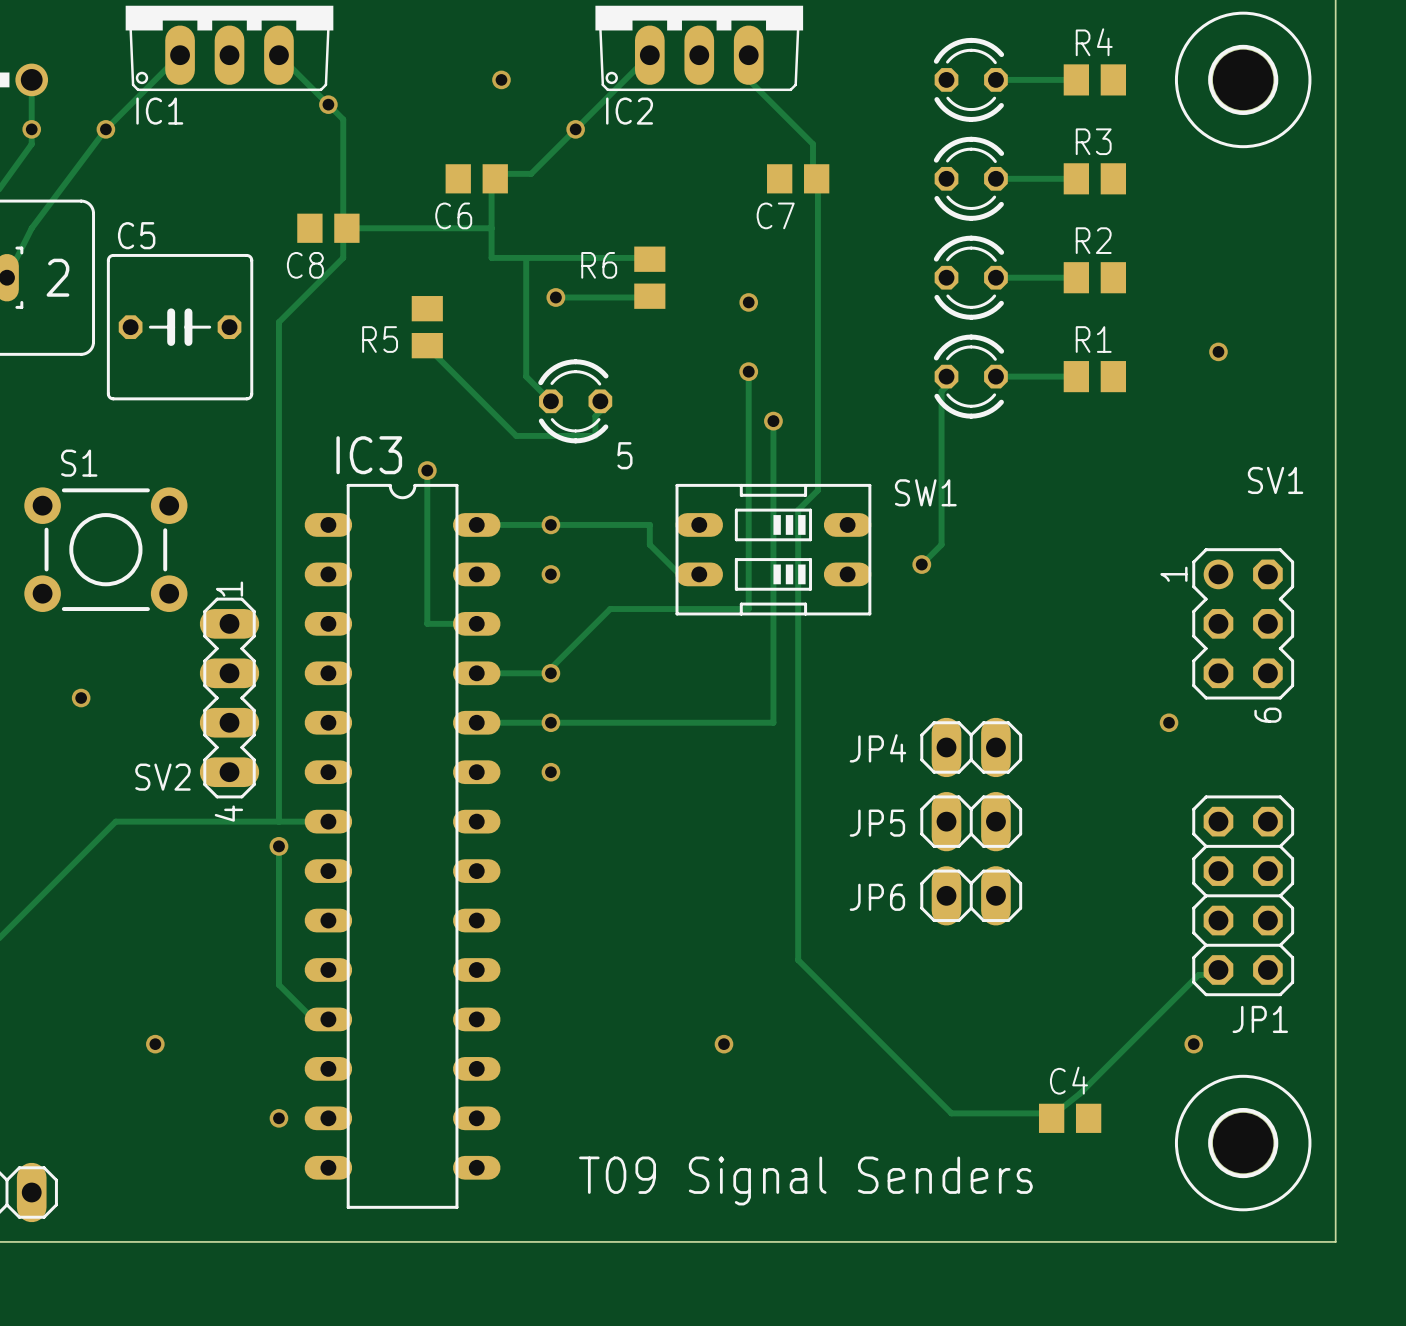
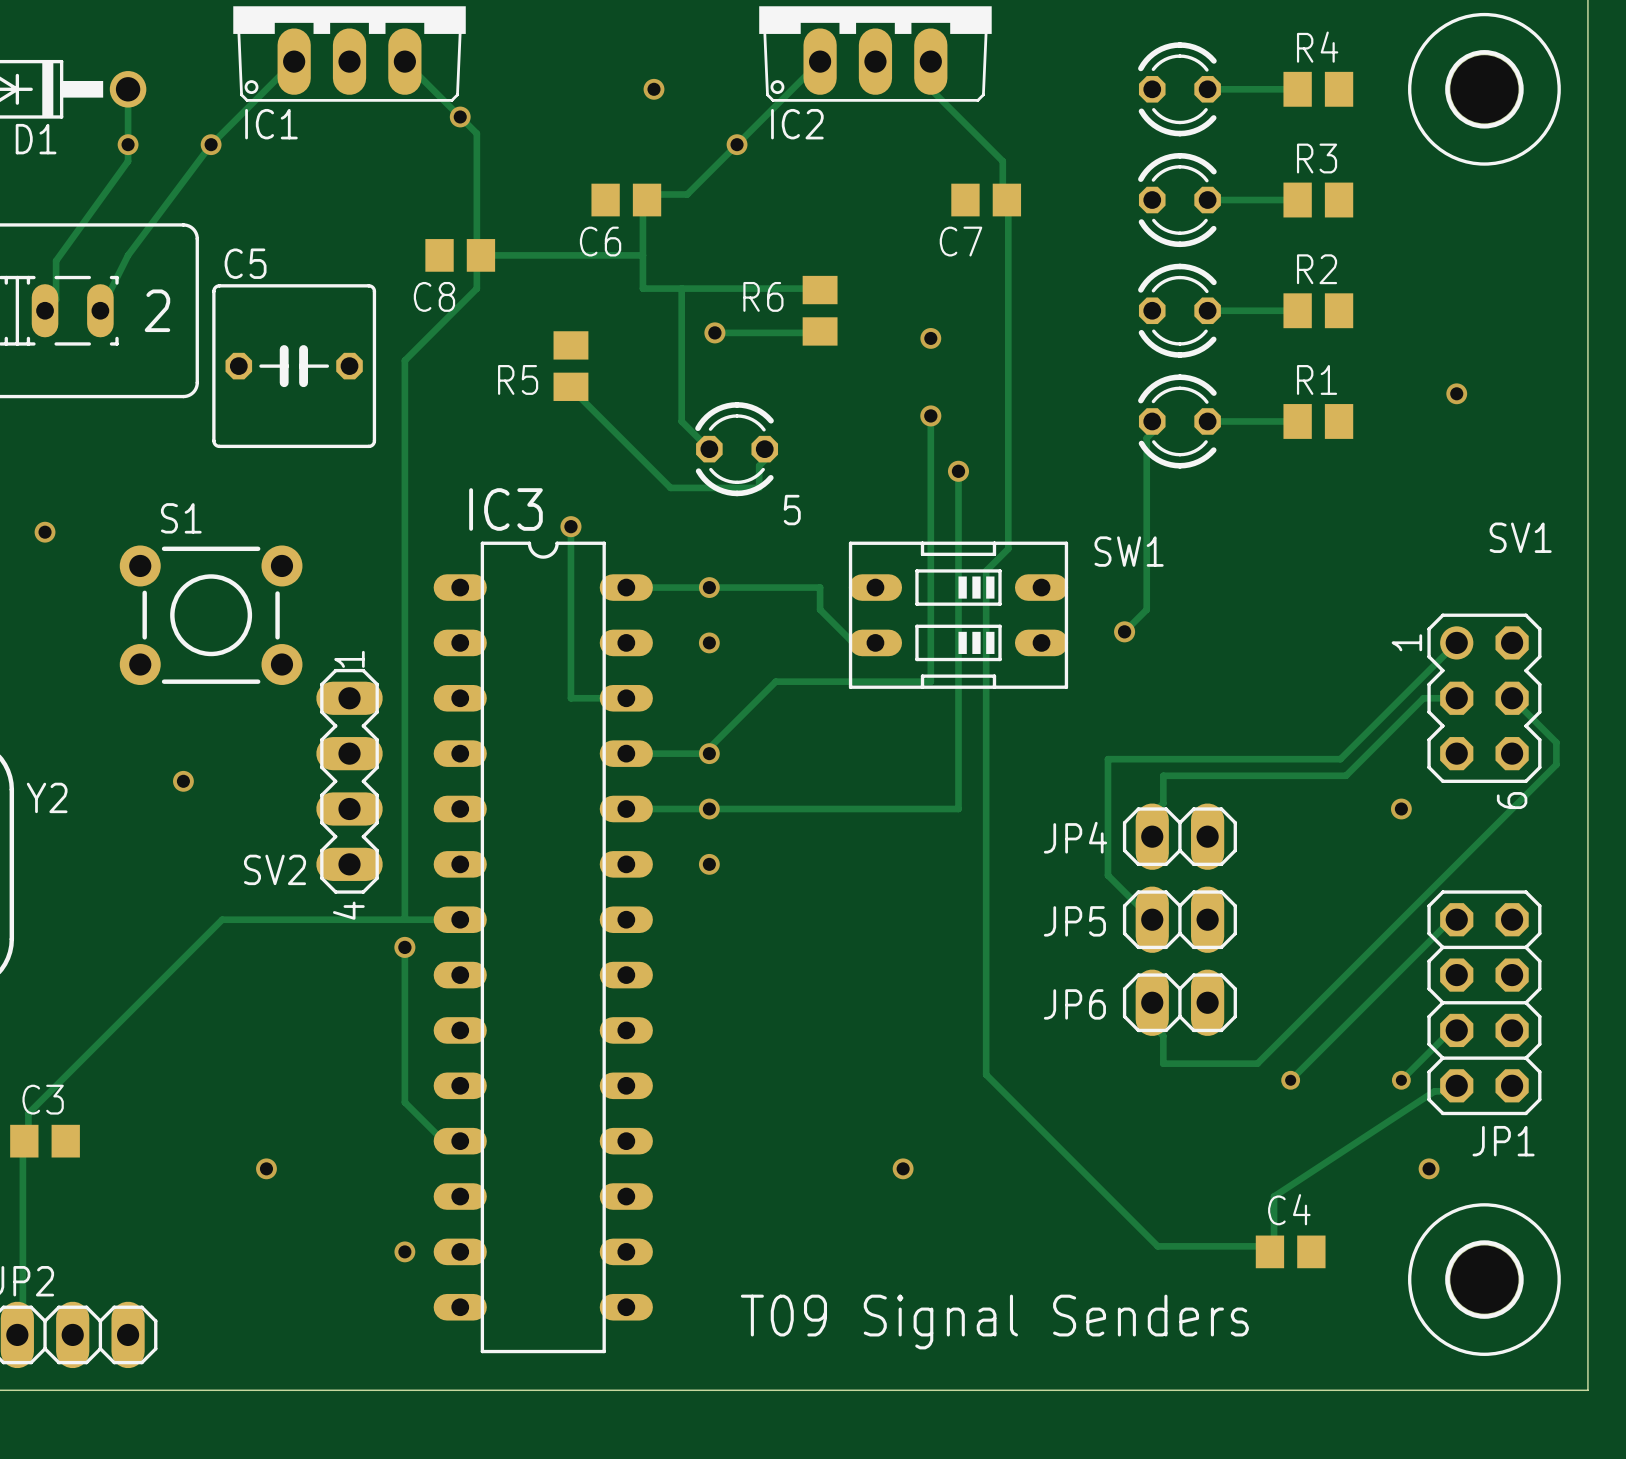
track: none -> (1456, 642) (1340, 759) (1107, 759) (1107, 875) (1152, 919)
track: none -> (1456, 698) (1423, 698) (1346, 775) (1163, 775) (1163, 803) (1152, 814) (1152, 836)
track: none -> (1512, 698) (1556, 742) (1556, 764) (1257, 1063) (1163, 1063) (1163, 1035) (1152, 1024) (1152, 1002)
track: none -> (1456, 919) (1451, 919) (1290, 1080)
track: none -> (1456, 1030) (1451, 1030) (1401, 1080)
via: none -> (1290, 1080)
via: none -> (1401, 1080)
track: (1198, 974) (1080, 1093) (1055, 1113) -> (1434, 1091) (1274, 1196) (1274, 1246)

